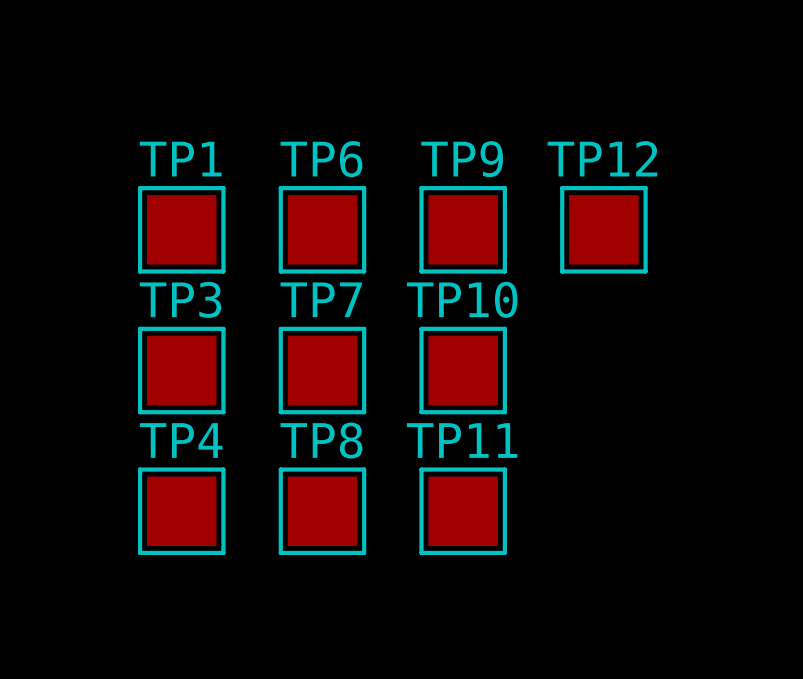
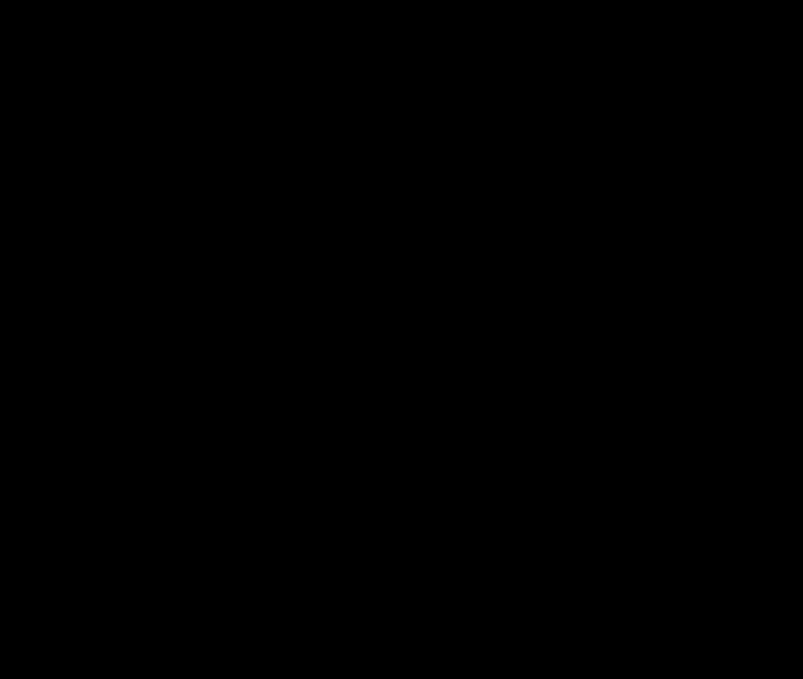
TP1: (181, 229) -> none
TP6: (322, 229) -> none
TP9: (463, 229) -> none
TP12: (603, 229) -> none
TP3: (181, 370) -> none
TP7: (322, 370) -> none
TP10: (463, 370) -> none
TP4: (181, 511) -> none
TP8: (322, 511) -> none
TP11: (463, 511) -> none

